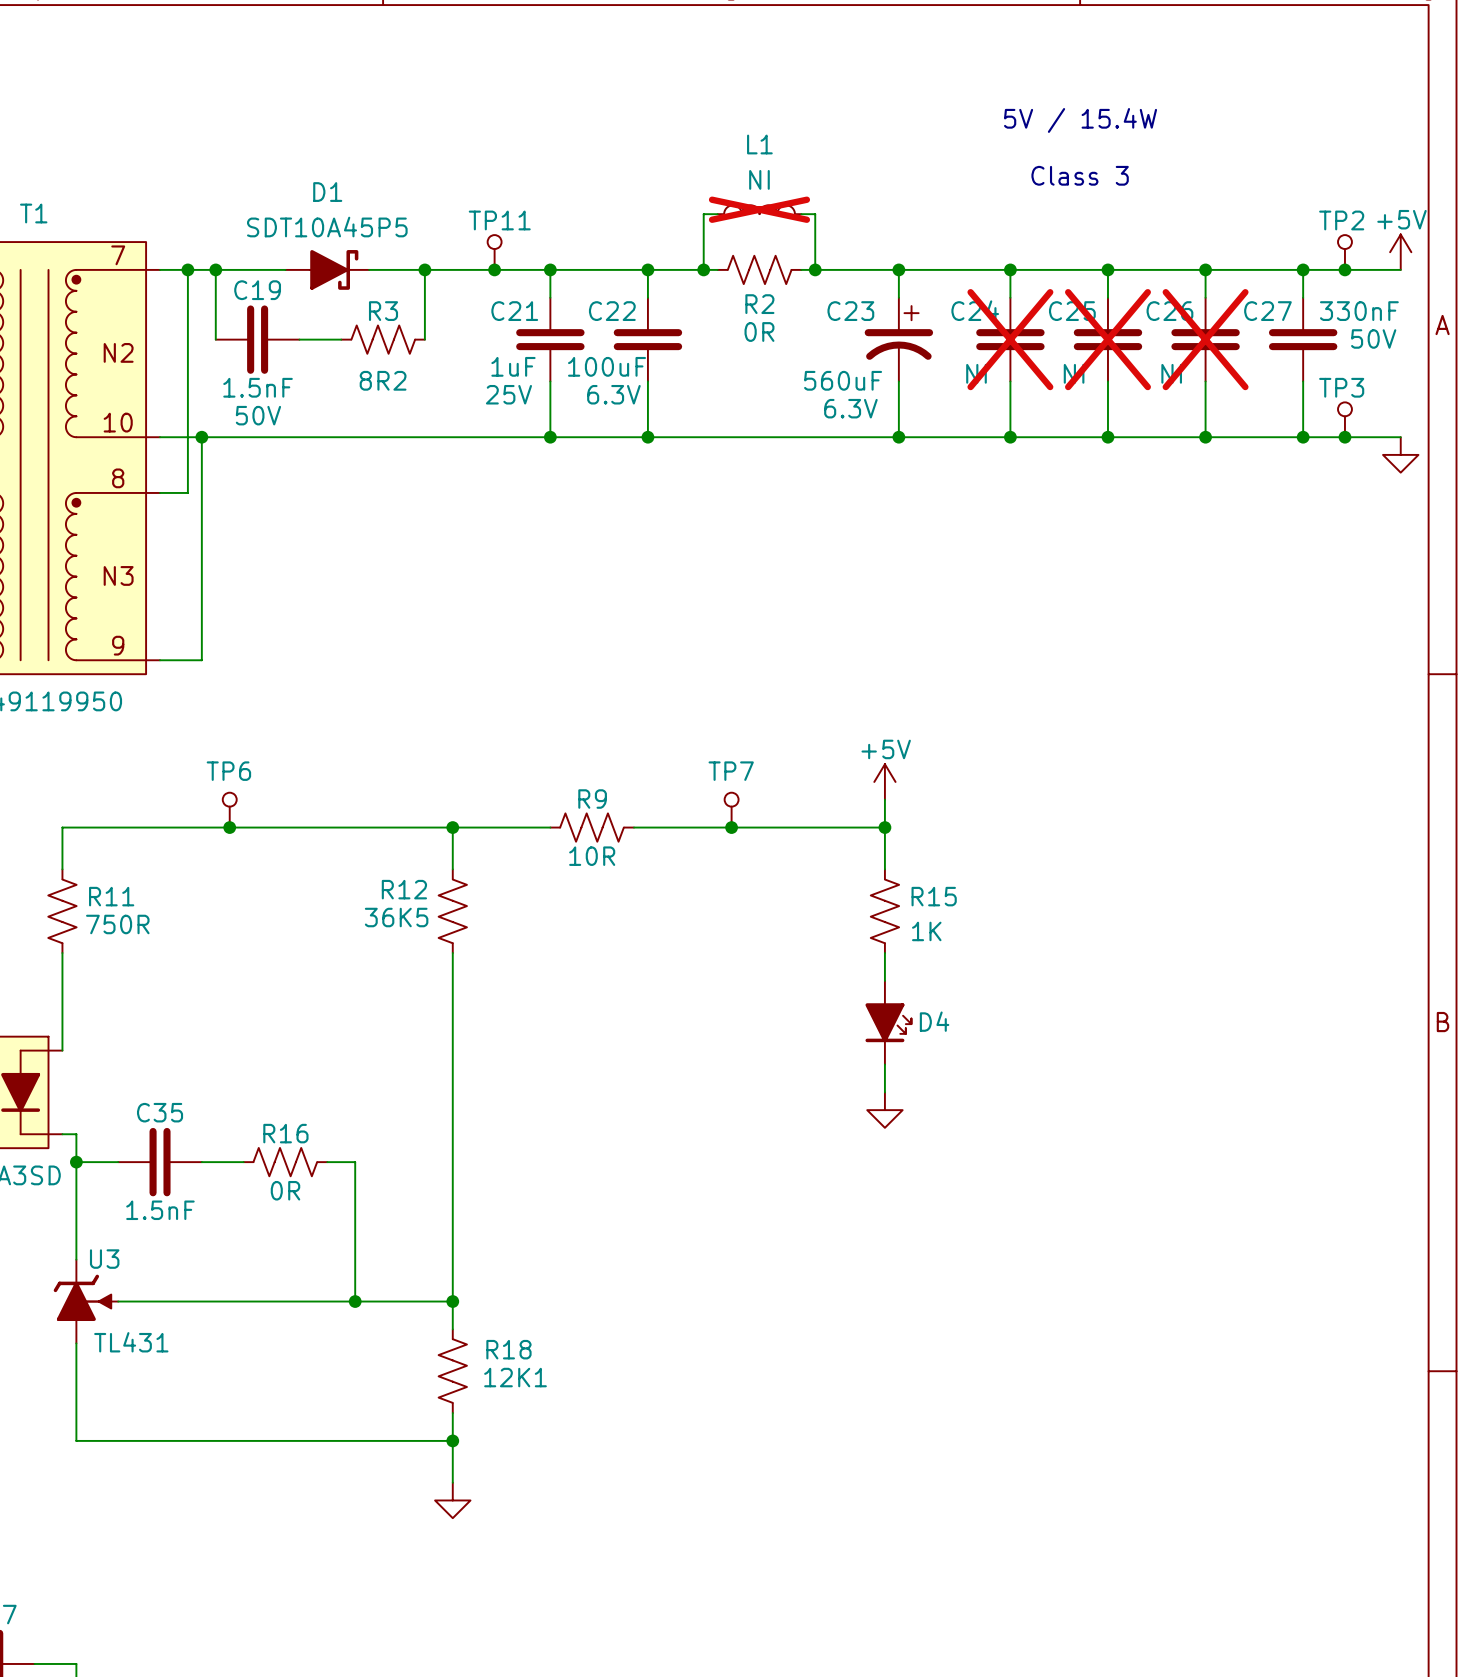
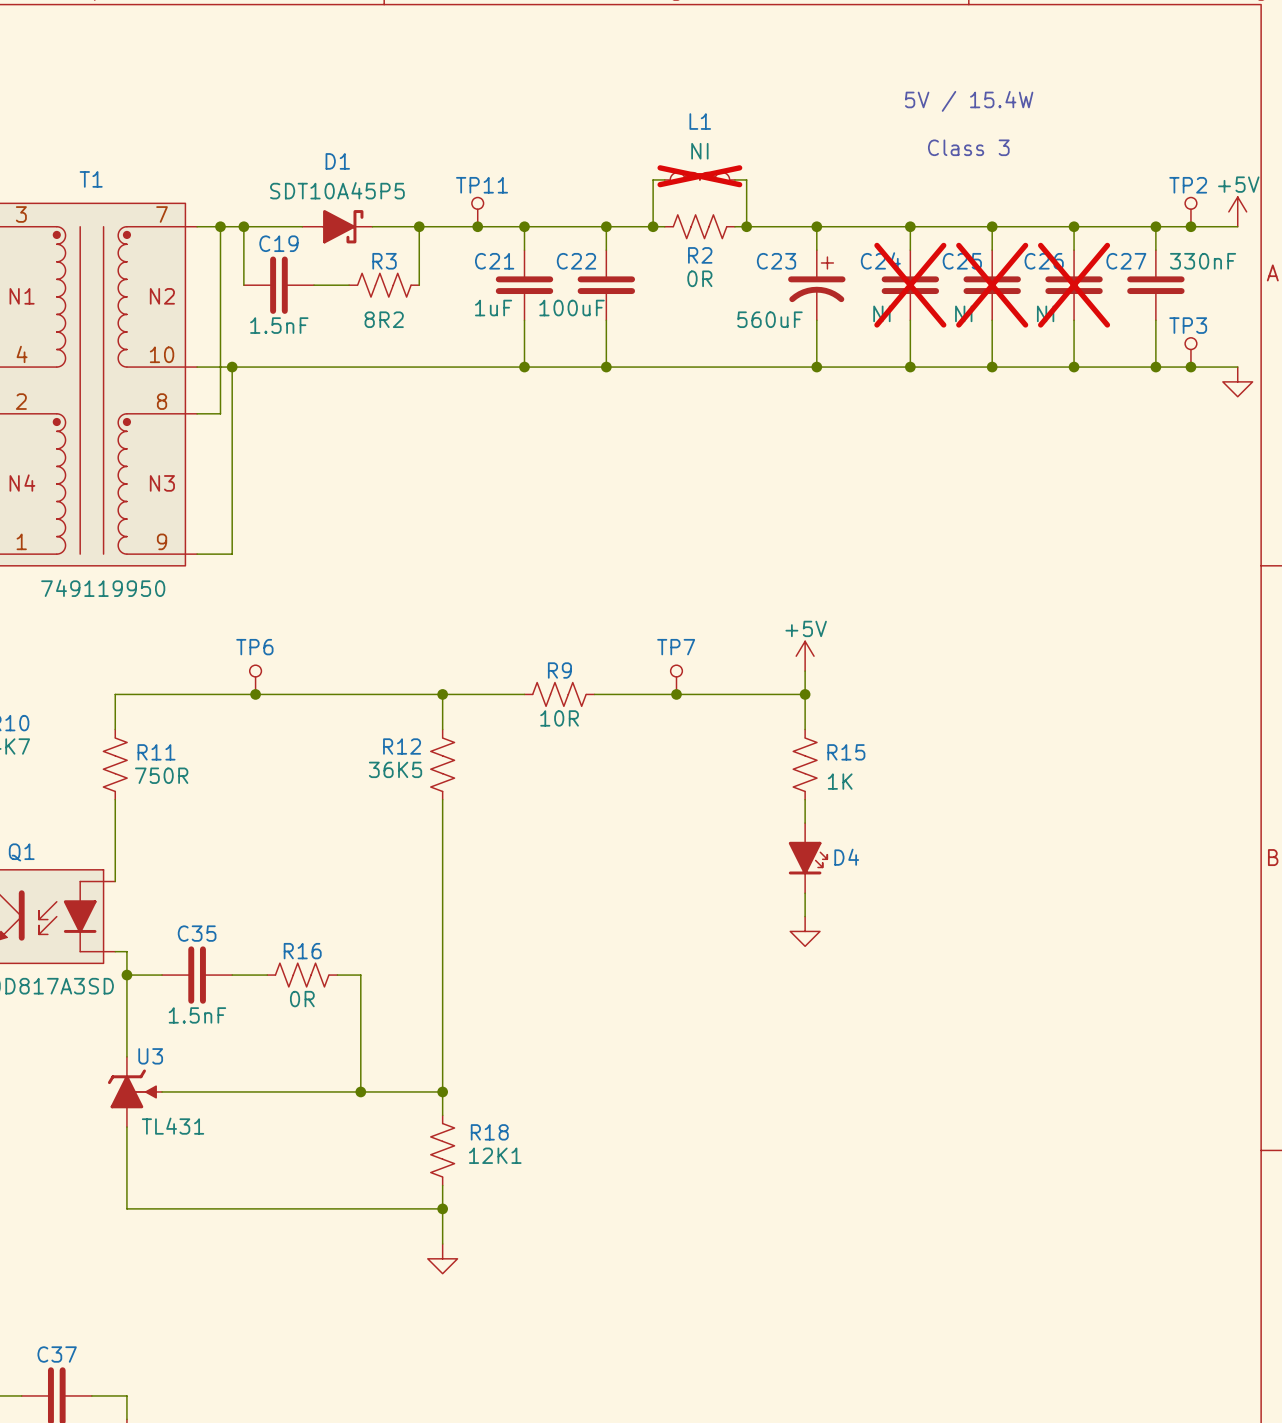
C27 text: 50V (1373, 338) -> none
C21 text: 25V (508, 394) -> none
C22 text: 6.3V (613, 394) -> none
C23 text: 6.3V (850, 408) -> none
C19 text: 50V (258, 415) -> none

